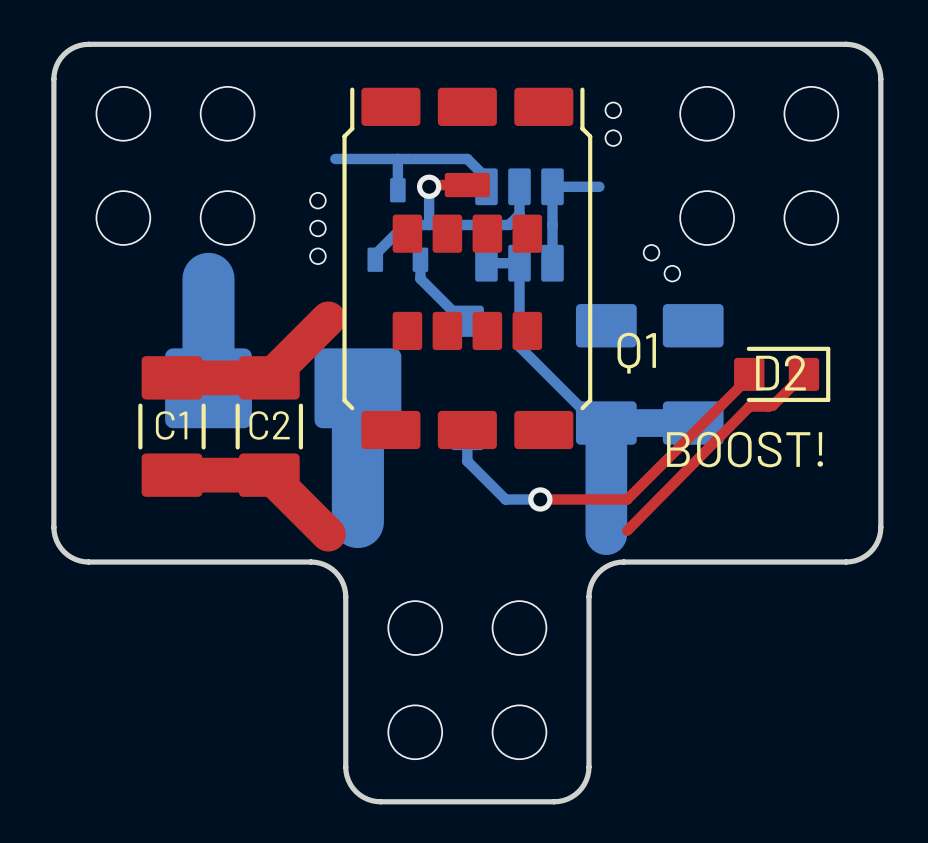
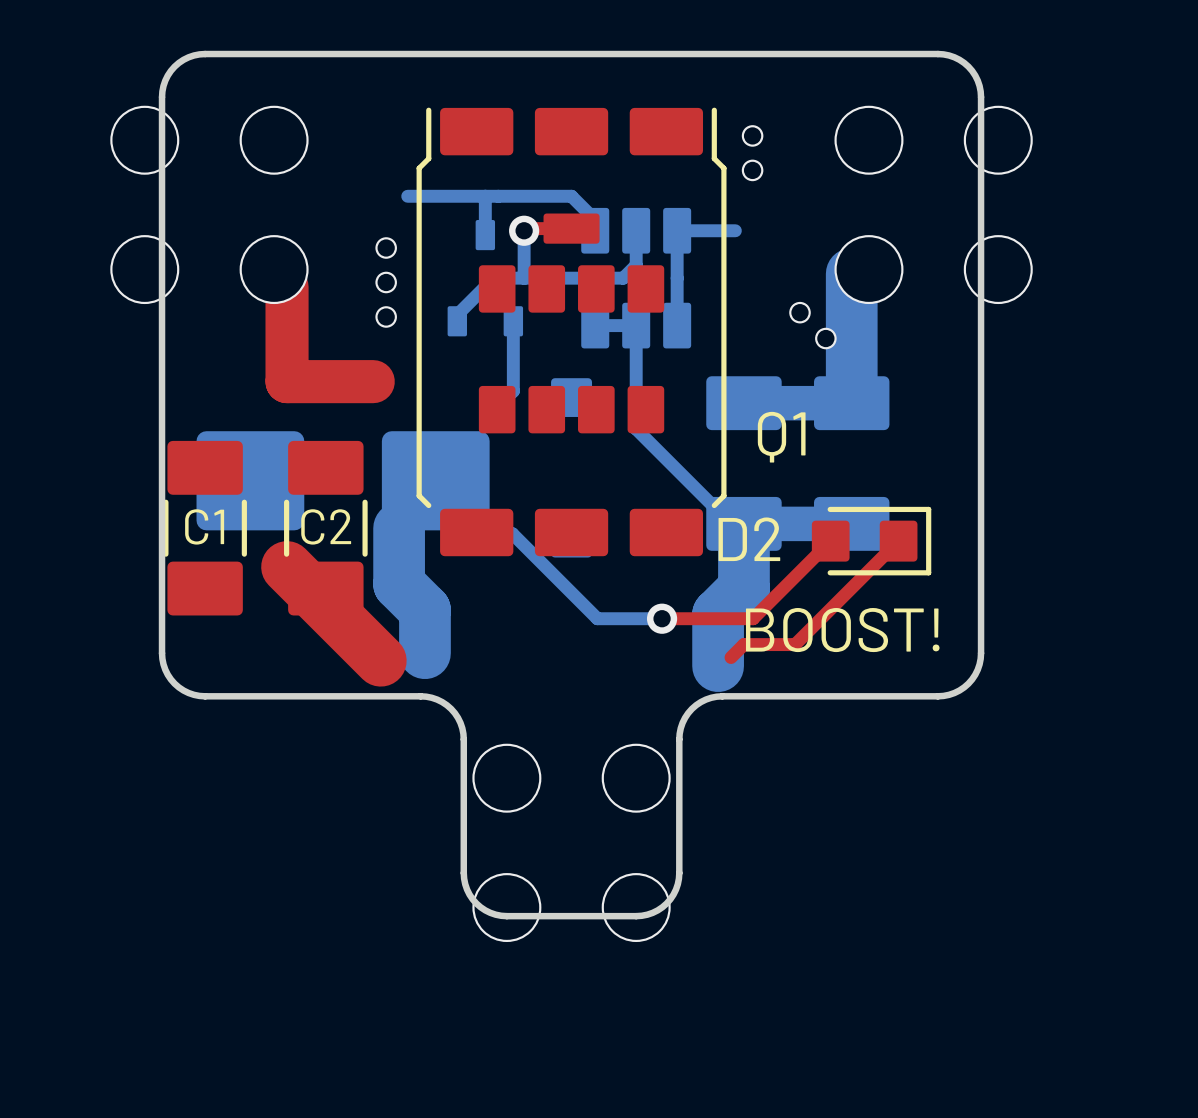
board edge: (172, 44) (79, 45) (71, 48) (61, 57) (55, 70) (53, 79) (55, 536) (64, 551) (79, 560) (172, 562) -> (205, 54) (188, 57) (174, 66) (165, 80) (162, 97) (162, 658) (167, 674) (174, 683) (188, 693) (205, 696)
board edge: (762, 44) (855, 45) (863, 48) (873, 57) (879, 70) (880, 79) (879, 536) (870, 551) (855, 560) (762, 562) -> (937, 54) (954, 57) (968, 66) (977, 80) (981, 97) (980, 658) (975, 674) (968, 683) (954, 693) (937, 696)
bottom track: none -> (851, 273) (851, 403) (743, 403)
top track: none -> (287, 286) (287, 381) (373, 381)
bottom track: (208, 278) (208, 388) -> none
bottom track: (420, 278) (462, 321) (467, 321) -> (513, 344) (513, 391) (511, 393)
top track: (328, 318) (269, 377) (172, 377) -> none
D2 name position: D2 (780, 372) -> D2 (749, 539)
top track: (749, 374) (749, 377) (627, 499) (613, 499) -> (830, 541) (753, 618)
D2 position: (782, 374) -> (871, 541)
top track: (803, 374) (772, 405) (749, 406) (627, 530) -> none
bottom track: (357, 388) (357, 522) -> none
bottom track: none -> (399, 528) (399, 584) (424, 610) (424, 653)
bottom track: (467, 434) (467, 461) (505, 499) -> (511, 533) (597, 618) (618, 618)
top track: none -> (898, 541) (795, 644) (743, 644) (731, 657)
text position: BOOST! (745, 449) -> BOOST! (842, 630)
top track: none -> (287, 566) (380, 660)
top track: (172, 475) (269, 475) (328, 534) -> none
bottom track: (606, 475) (606, 534) -> (743, 588) (718, 614) (718, 666)
board edge: (311, 562) (324, 564) (332, 569) (338, 575) (344, 587) (346, 771) (350, 784) (355, 791) (367, 799) (380, 801) (554, 801) (567, 799) (578, 791) (586, 780) (588, 767) (589, 592) (593, 579) (599, 572) (610, 564) (623, 562) -> (377, 696) (431, 697) (446, 705) (458, 717) (463, 739) (465, 884) (472, 899) (480, 907) (490, 912) (506, 916) (636, 916) (652, 912) (662, 907) (673, 894) (678, 878) (679, 739) (682, 722) (691, 708) (711, 697) (765, 696)

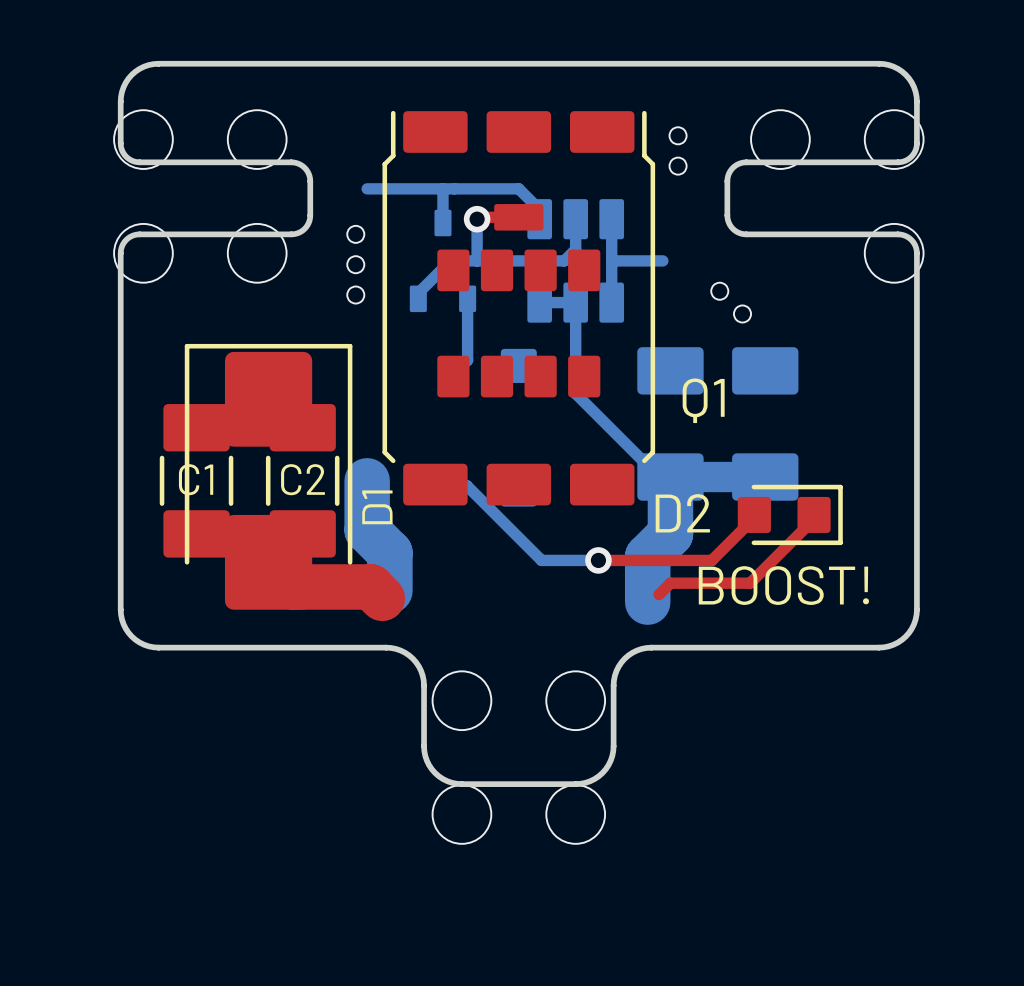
board edge: (205, 54) (188, 57) (174, 66) (165, 80) (162, 97) (162, 653) (165, 669) (178, 687) (199, 695) (431, 697) (446, 705) (458, 717) (463, 733) (463, 760) -> (196, 63) (148, 65) (139, 68) (128, 78) (122, 91) (120, 101) (120, 145) (124, 154) (132, 160) (139, 162) (298, 163) (304, 167) (309, 176) (310, 217) (304, 228) (293, 234) (137, 234) (128, 238) (122, 246) (120, 609) (123, 624) (135, 639) (153, 647) (395, 648) (409, 655) (416, 662) (422, 675) (424, 685)
board edge: (937, 54) (954, 57) (968, 66) (977, 80) (981, 97) (981, 653) (977, 669) (964, 687) (943, 695) (711, 697) (696, 705) (685, 717) (679, 733) (679, 760) -> (841, 63) (888, 65) (897, 68) (909, 78) (915, 91) (916, 101) (916, 145) (913, 154) (905, 160) (897, 162) (739, 163) (732, 167) (727, 176) (727, 217) (732, 228) (743, 234) (900, 234) (909, 238) (915, 246) (916, 609) (914, 624) (902, 639) (883, 647) (641, 648) (628, 655) (621, 662) (614, 675) (613, 685)
bottom track: none -> (367, 188) (374, 188)
bottom track: (677, 230) (735, 230) -> (611, 260) (662, 260)
via: (868, 269) -> none
bottom track: (851, 273) (851, 403) (743, 403) -> none
top track: (287, 286) (287, 381) (373, 381) -> none
D1 side: bottom (343, 480) -> top (268, 476)
top track: (830, 541) (753, 618) -> (758, 514) (754, 514) (754, 517) (711, 560) (678, 560)
D2 position: (871, 541) -> (790, 514)
top track: (898, 541) (795, 644) -> (814, 518) (750, 583) (715, 583)
top track: (287, 566) (380, 660) -> none
top track: none -> (268, 562) (293, 586) (370, 586) (382, 598)
text position: BOOST! (842, 630) -> BOOST! (783, 585)
board edge: (463, 829) (464, 878) (469, 894) (485, 910) (506, 916) (636, 916) (657, 910) (670, 899) (677, 884) (679, 829) -> (424, 746) (426, 760) (435, 773) (447, 781) (461, 784) (585, 782) (598, 776) (605, 769) (612, 756) (613, 746)

